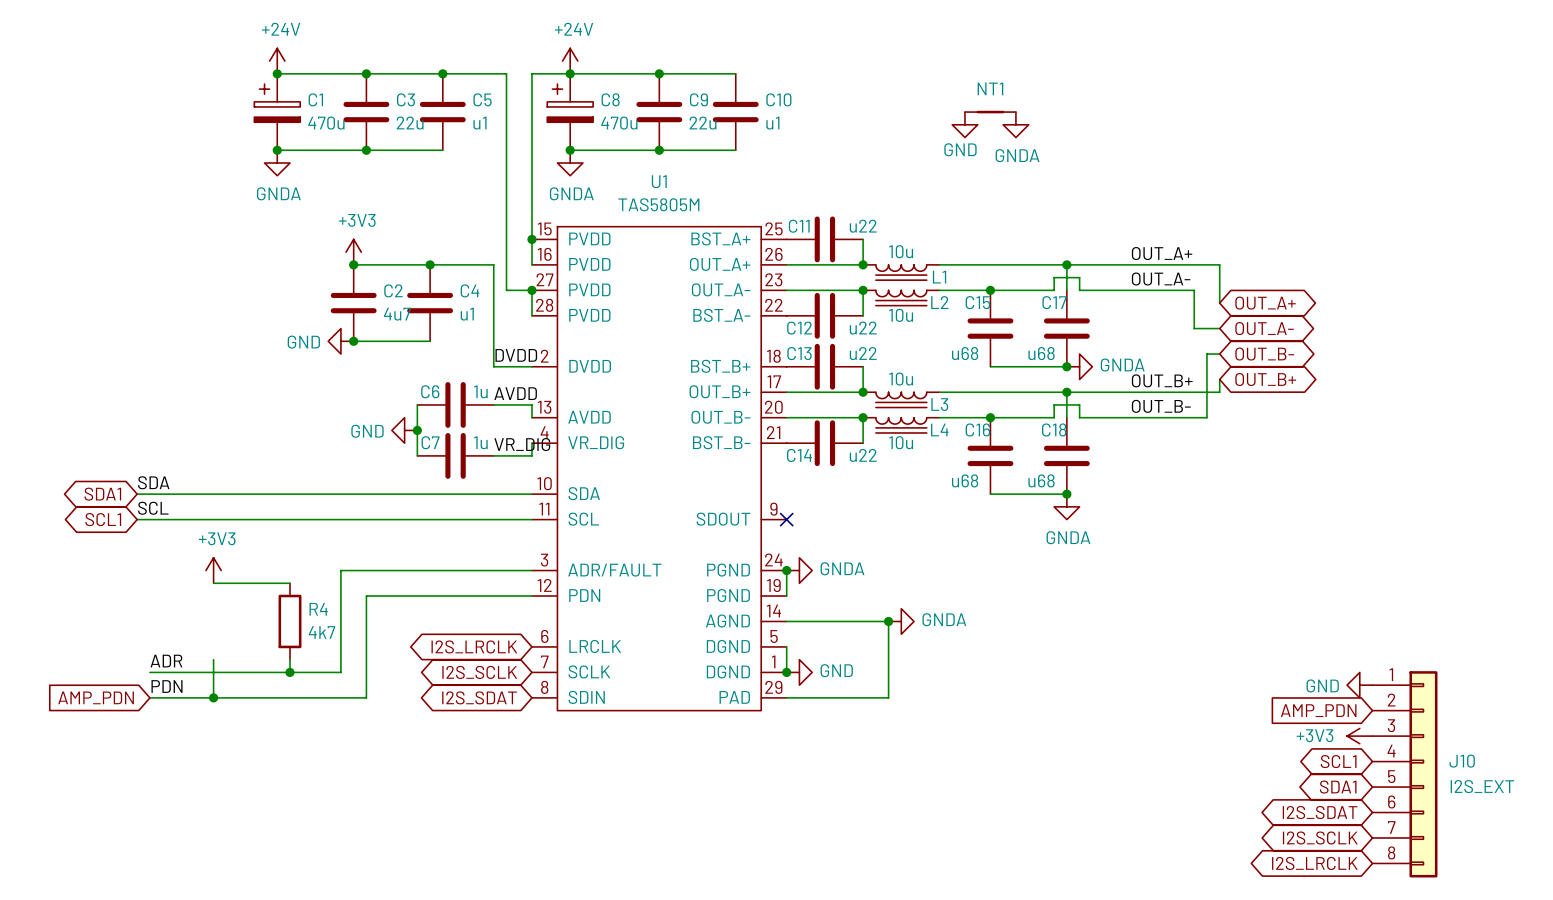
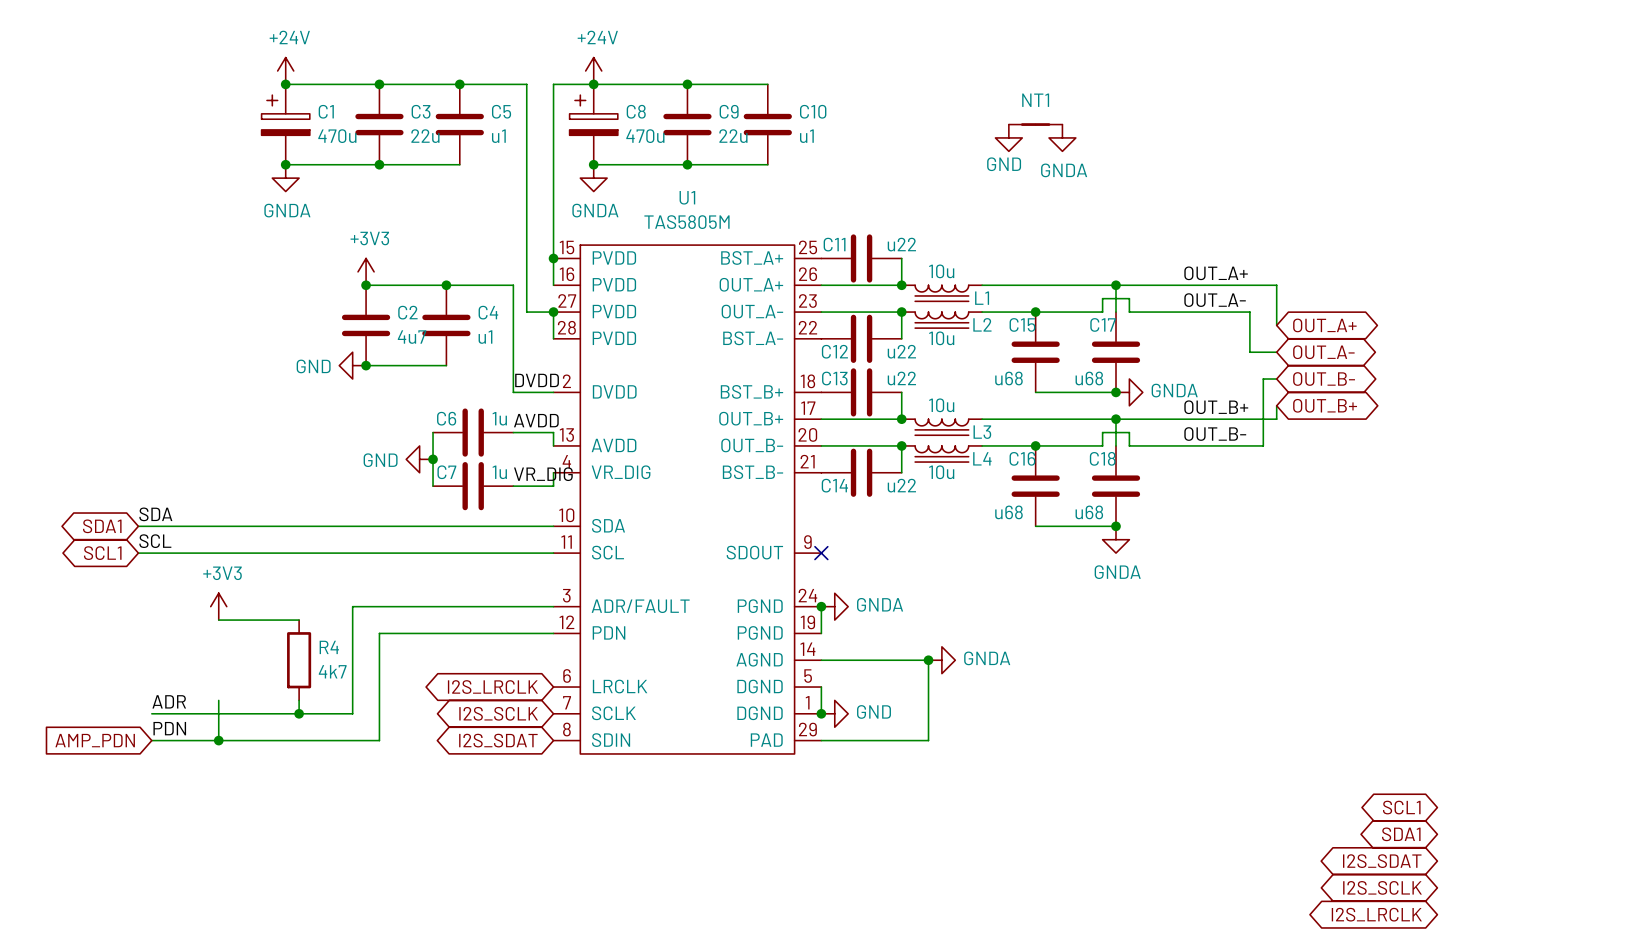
power symbol: GND (1359, 685) -> none
global label: AMP_PDN (1318, 710) -> none
power symbol: +3V3 (1359, 736) -> none
J10: I2S_EXT (1405, 774) -> none

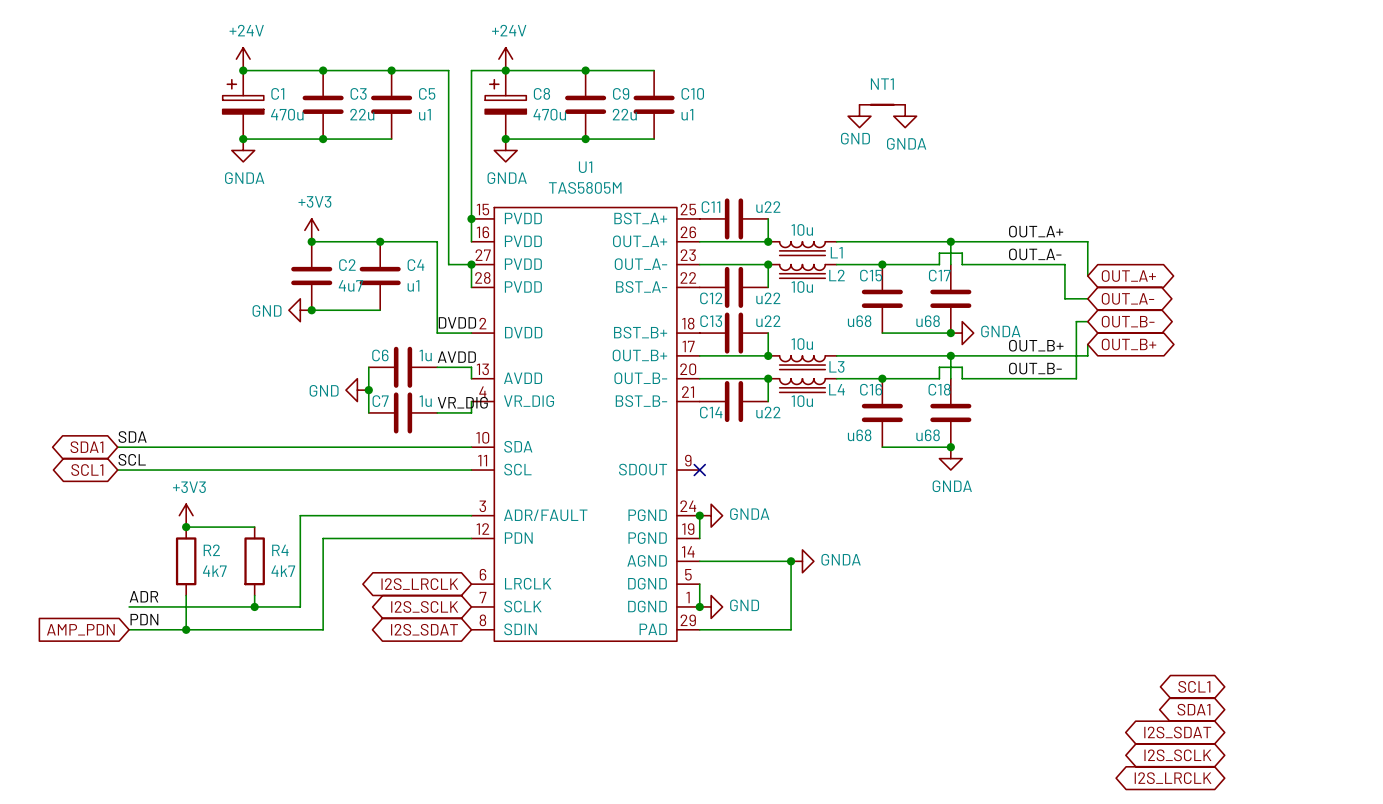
junction: none -> (186, 527)
R2: none -> 4k7 (186, 561)

